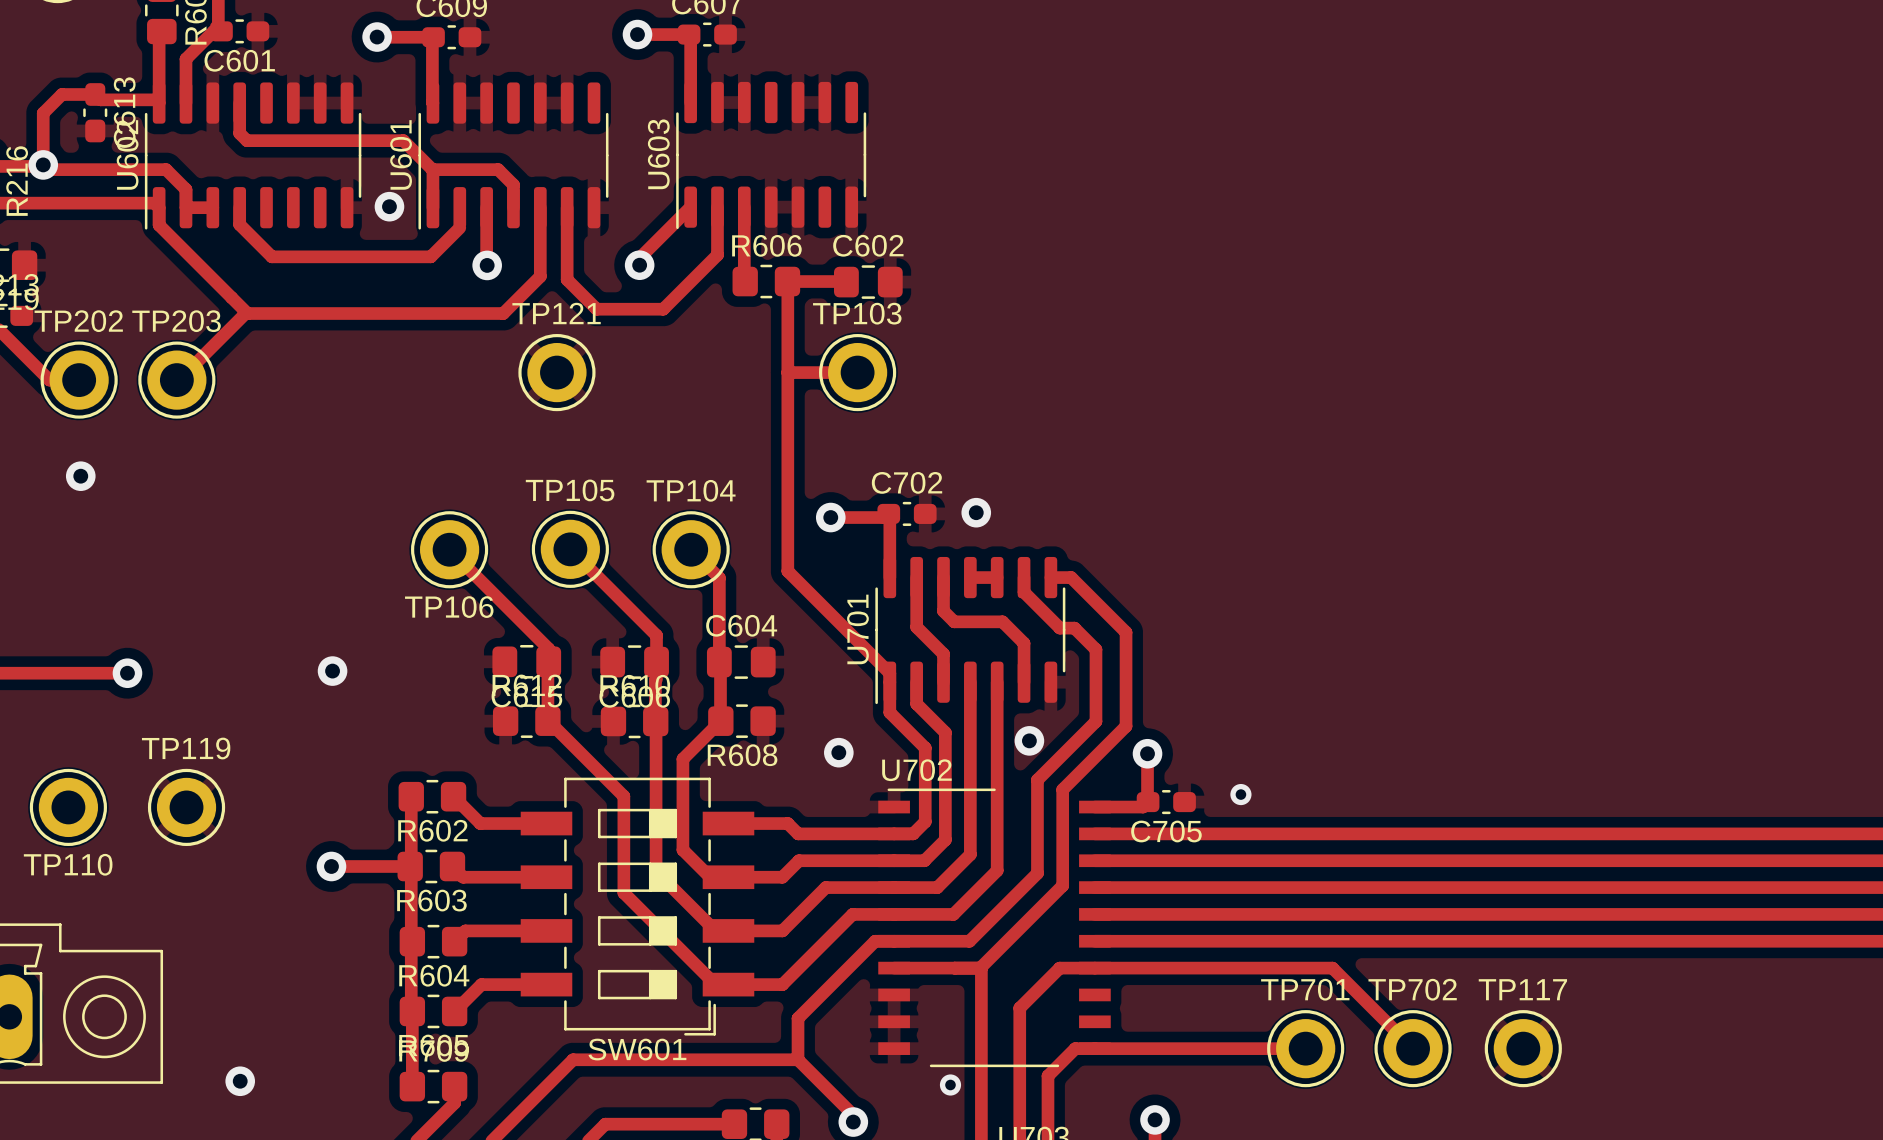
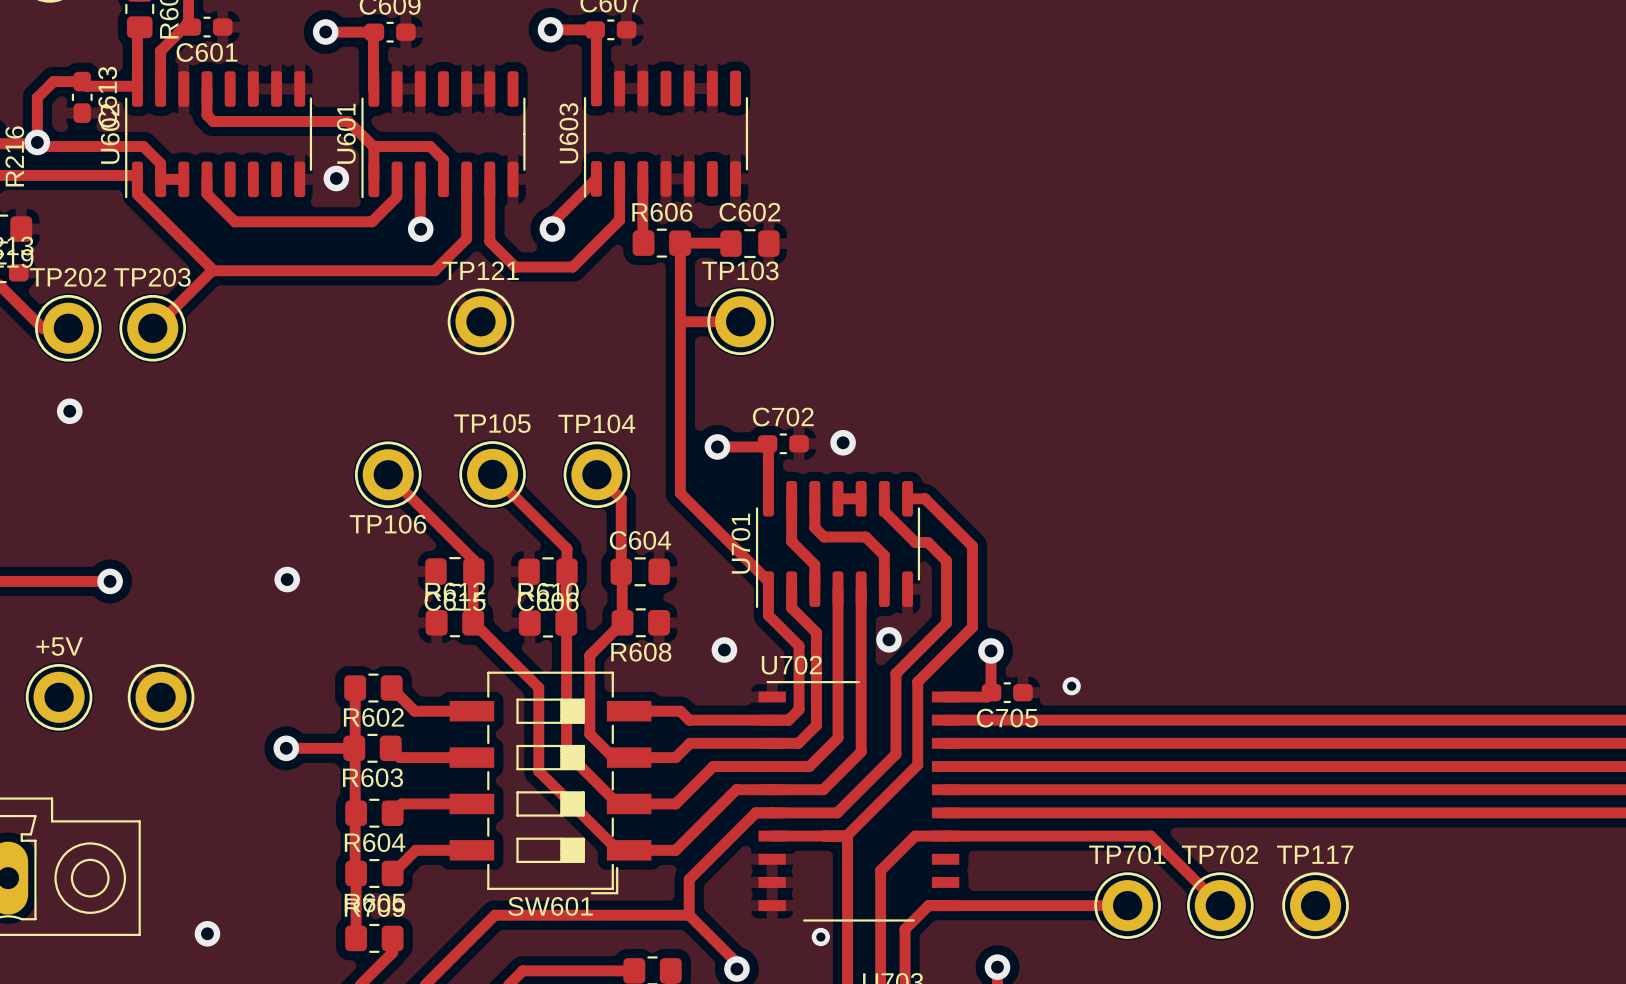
TP110 value: none -> +5V (59, 646)
TP119 name: TP119 (186, 748) -> none
TP110 name: TP110 (68, 864) -> none

